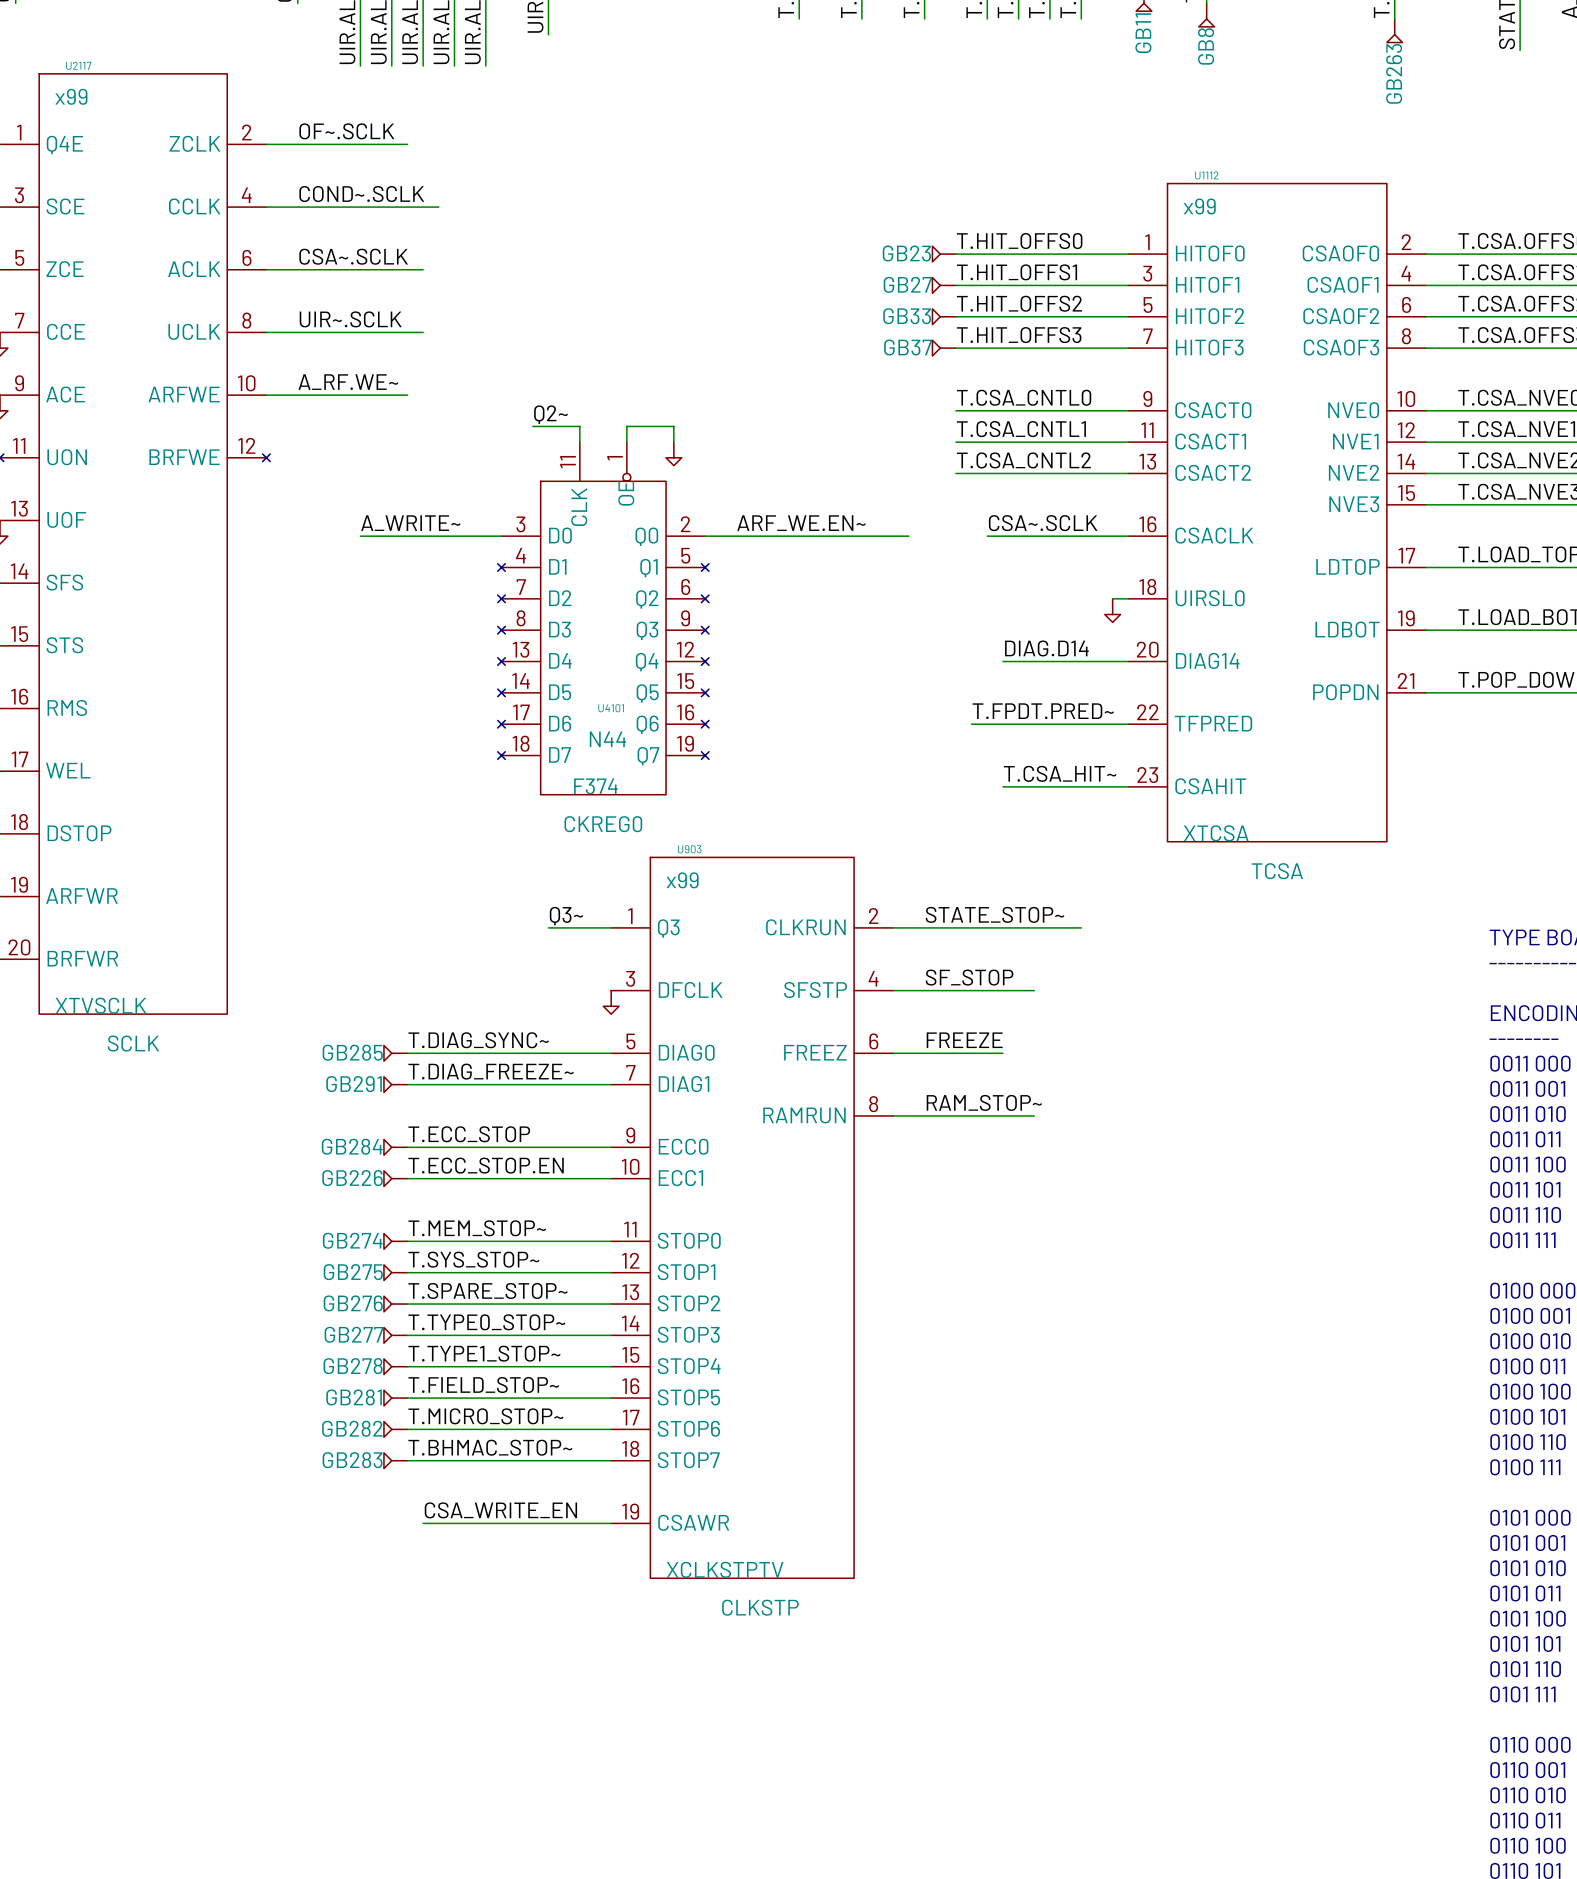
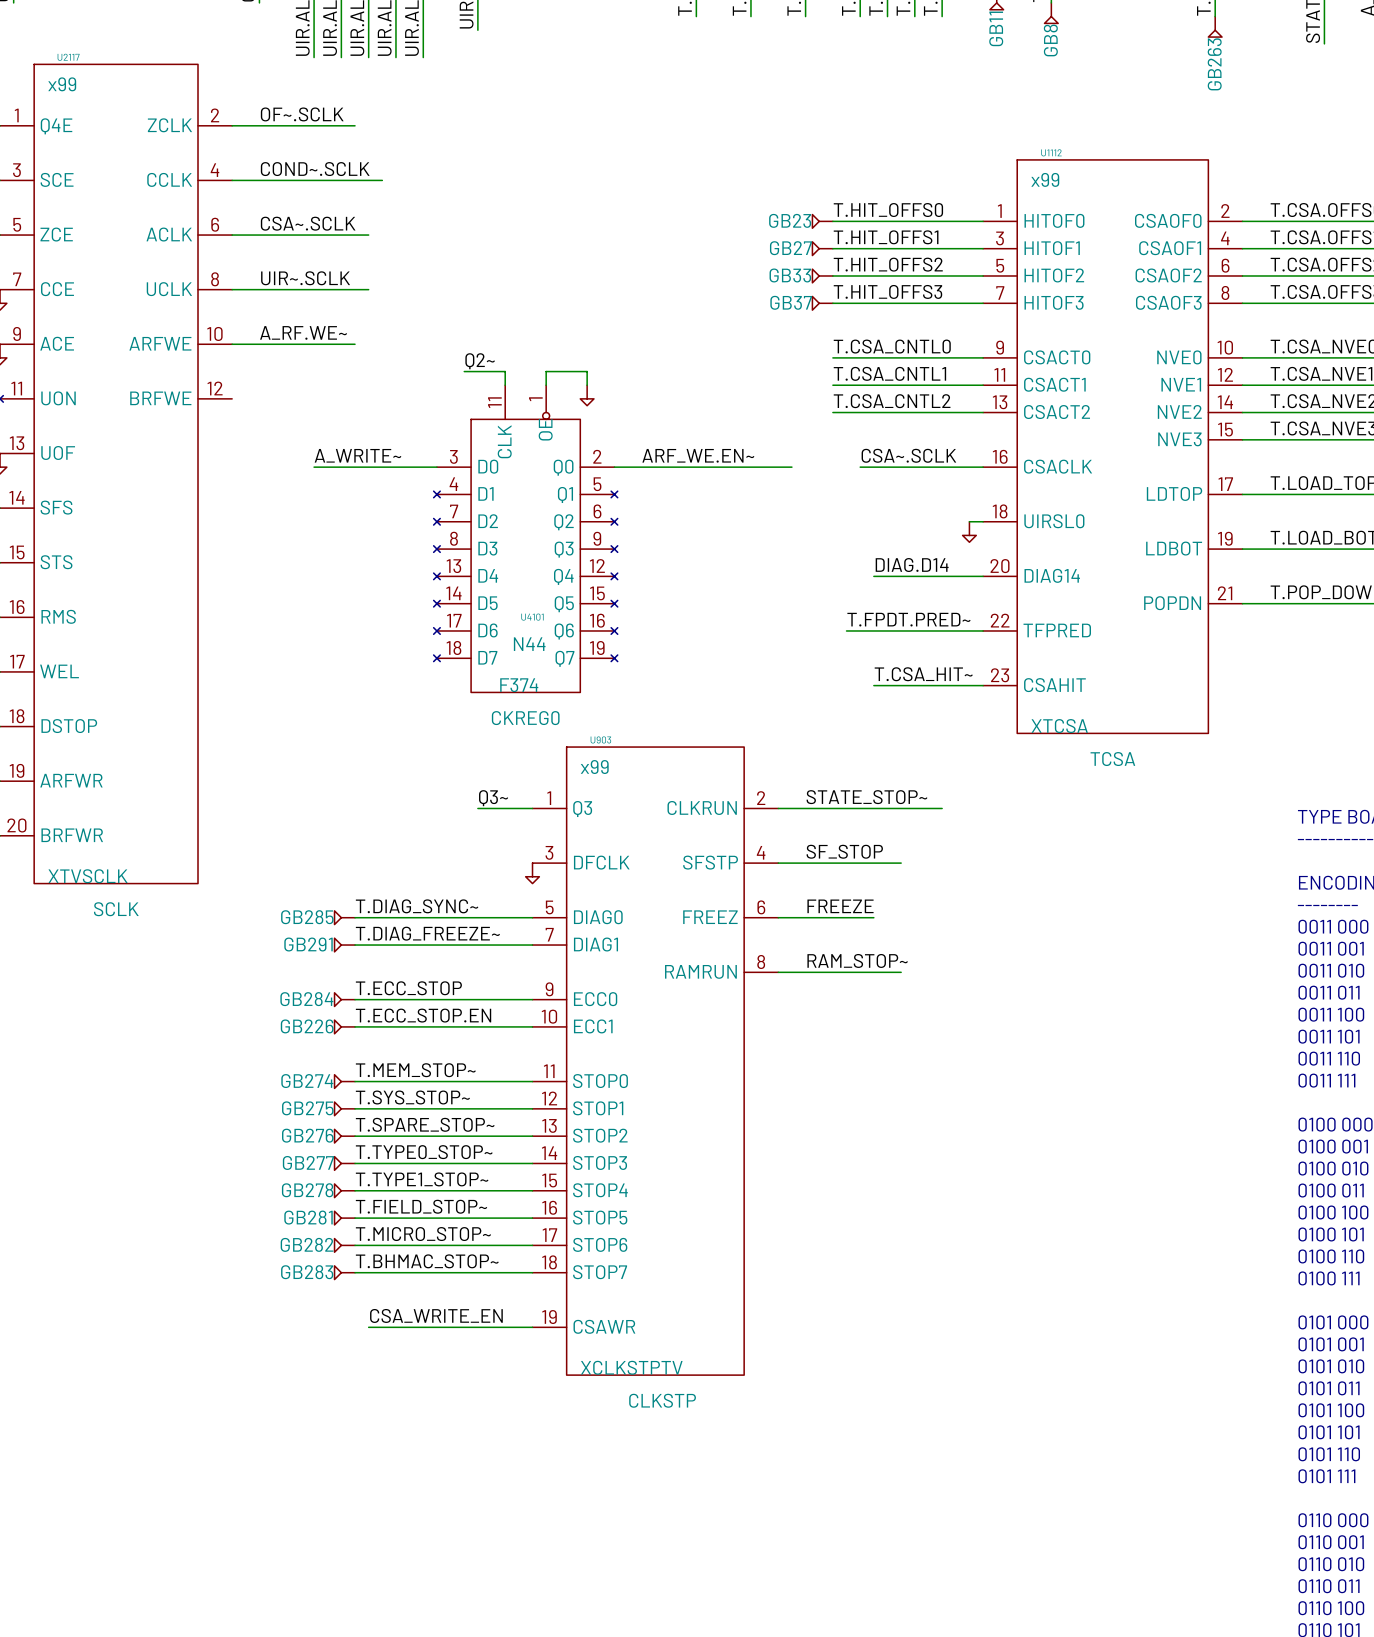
no-connect mark: (266, 457) -> none

